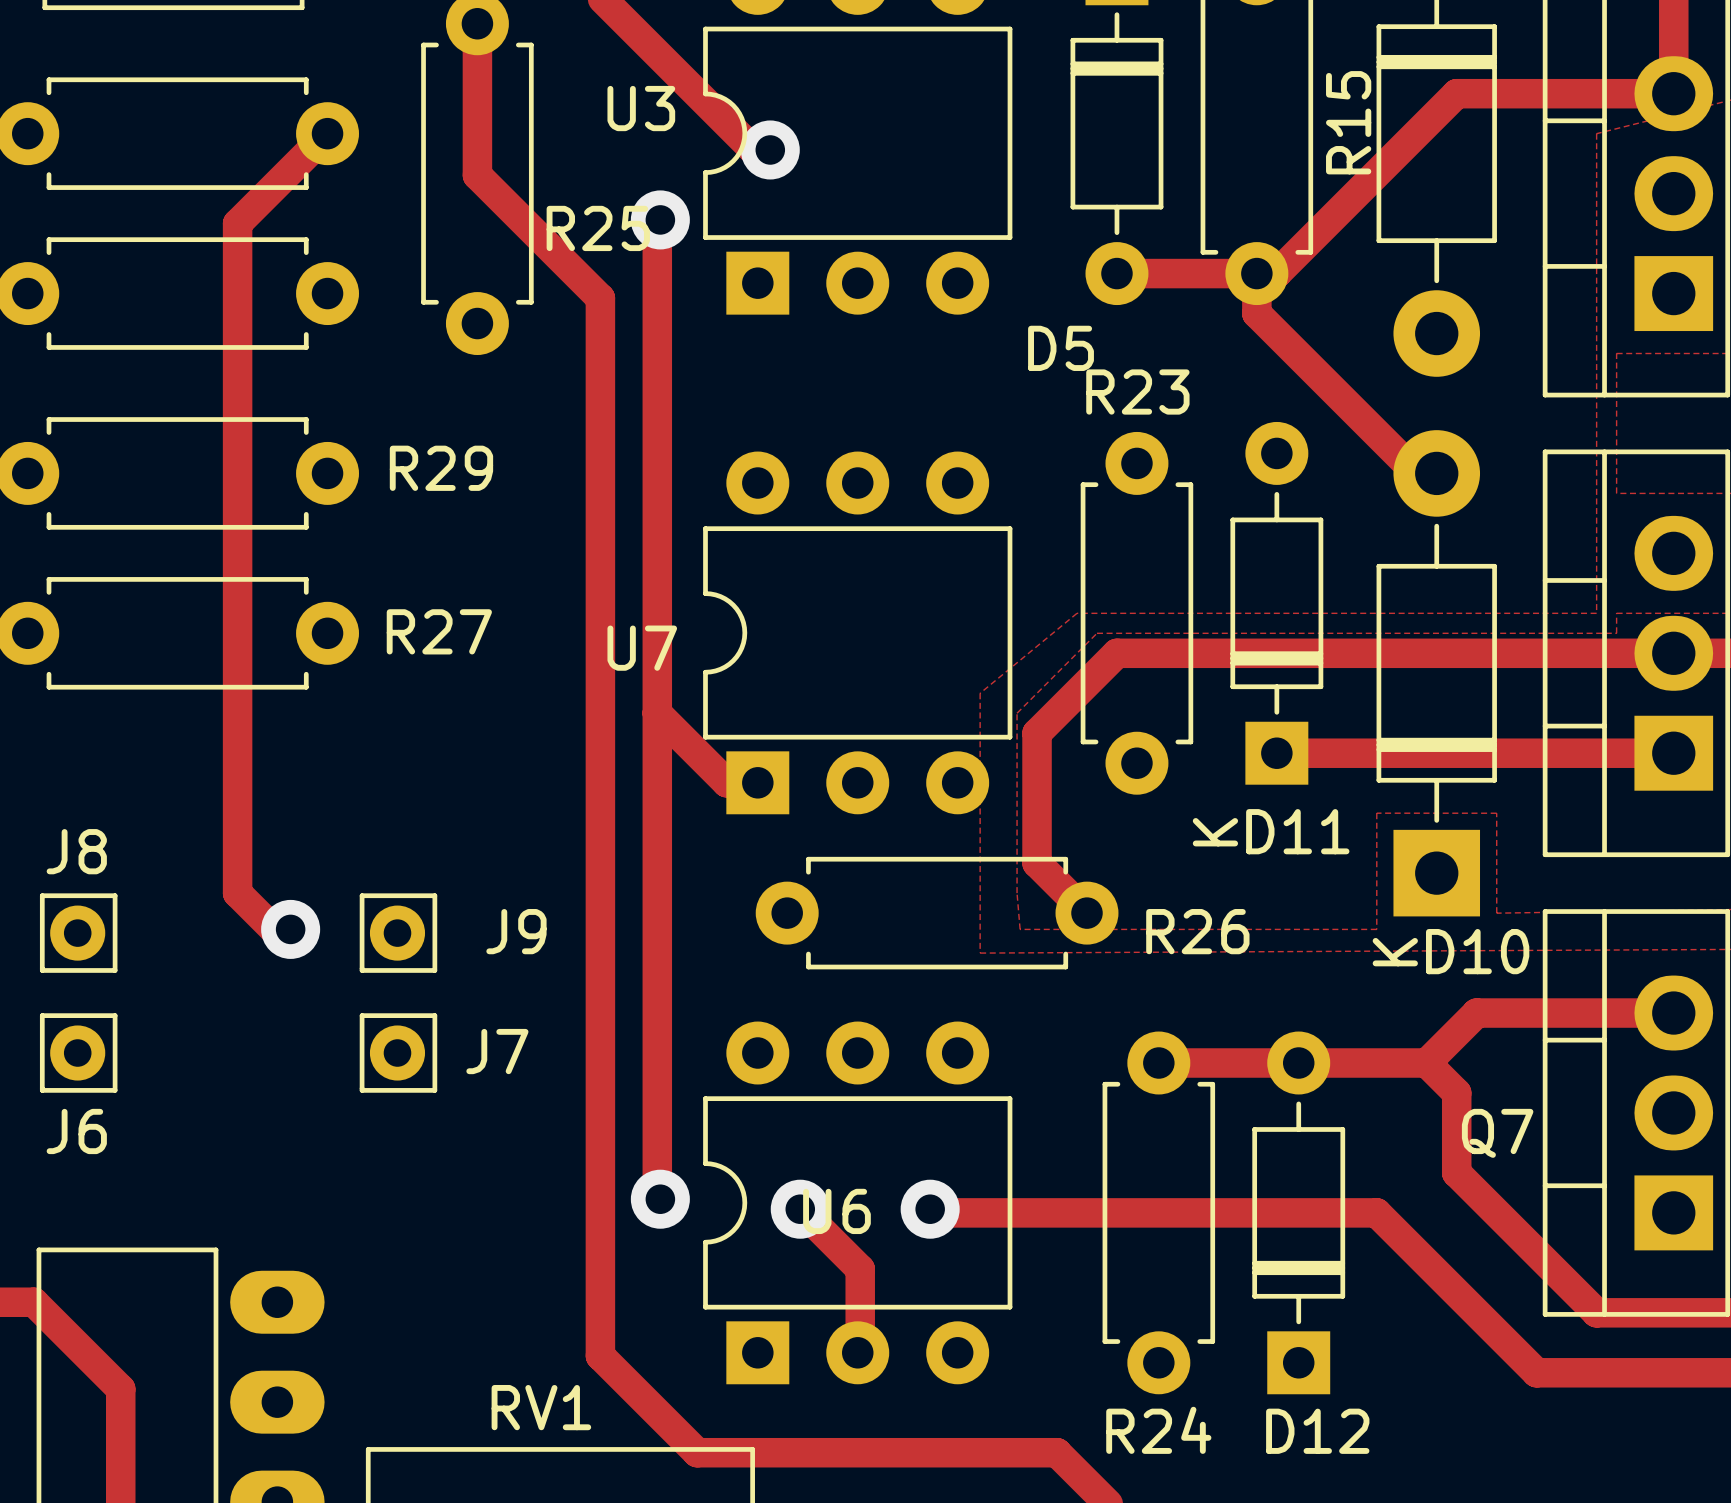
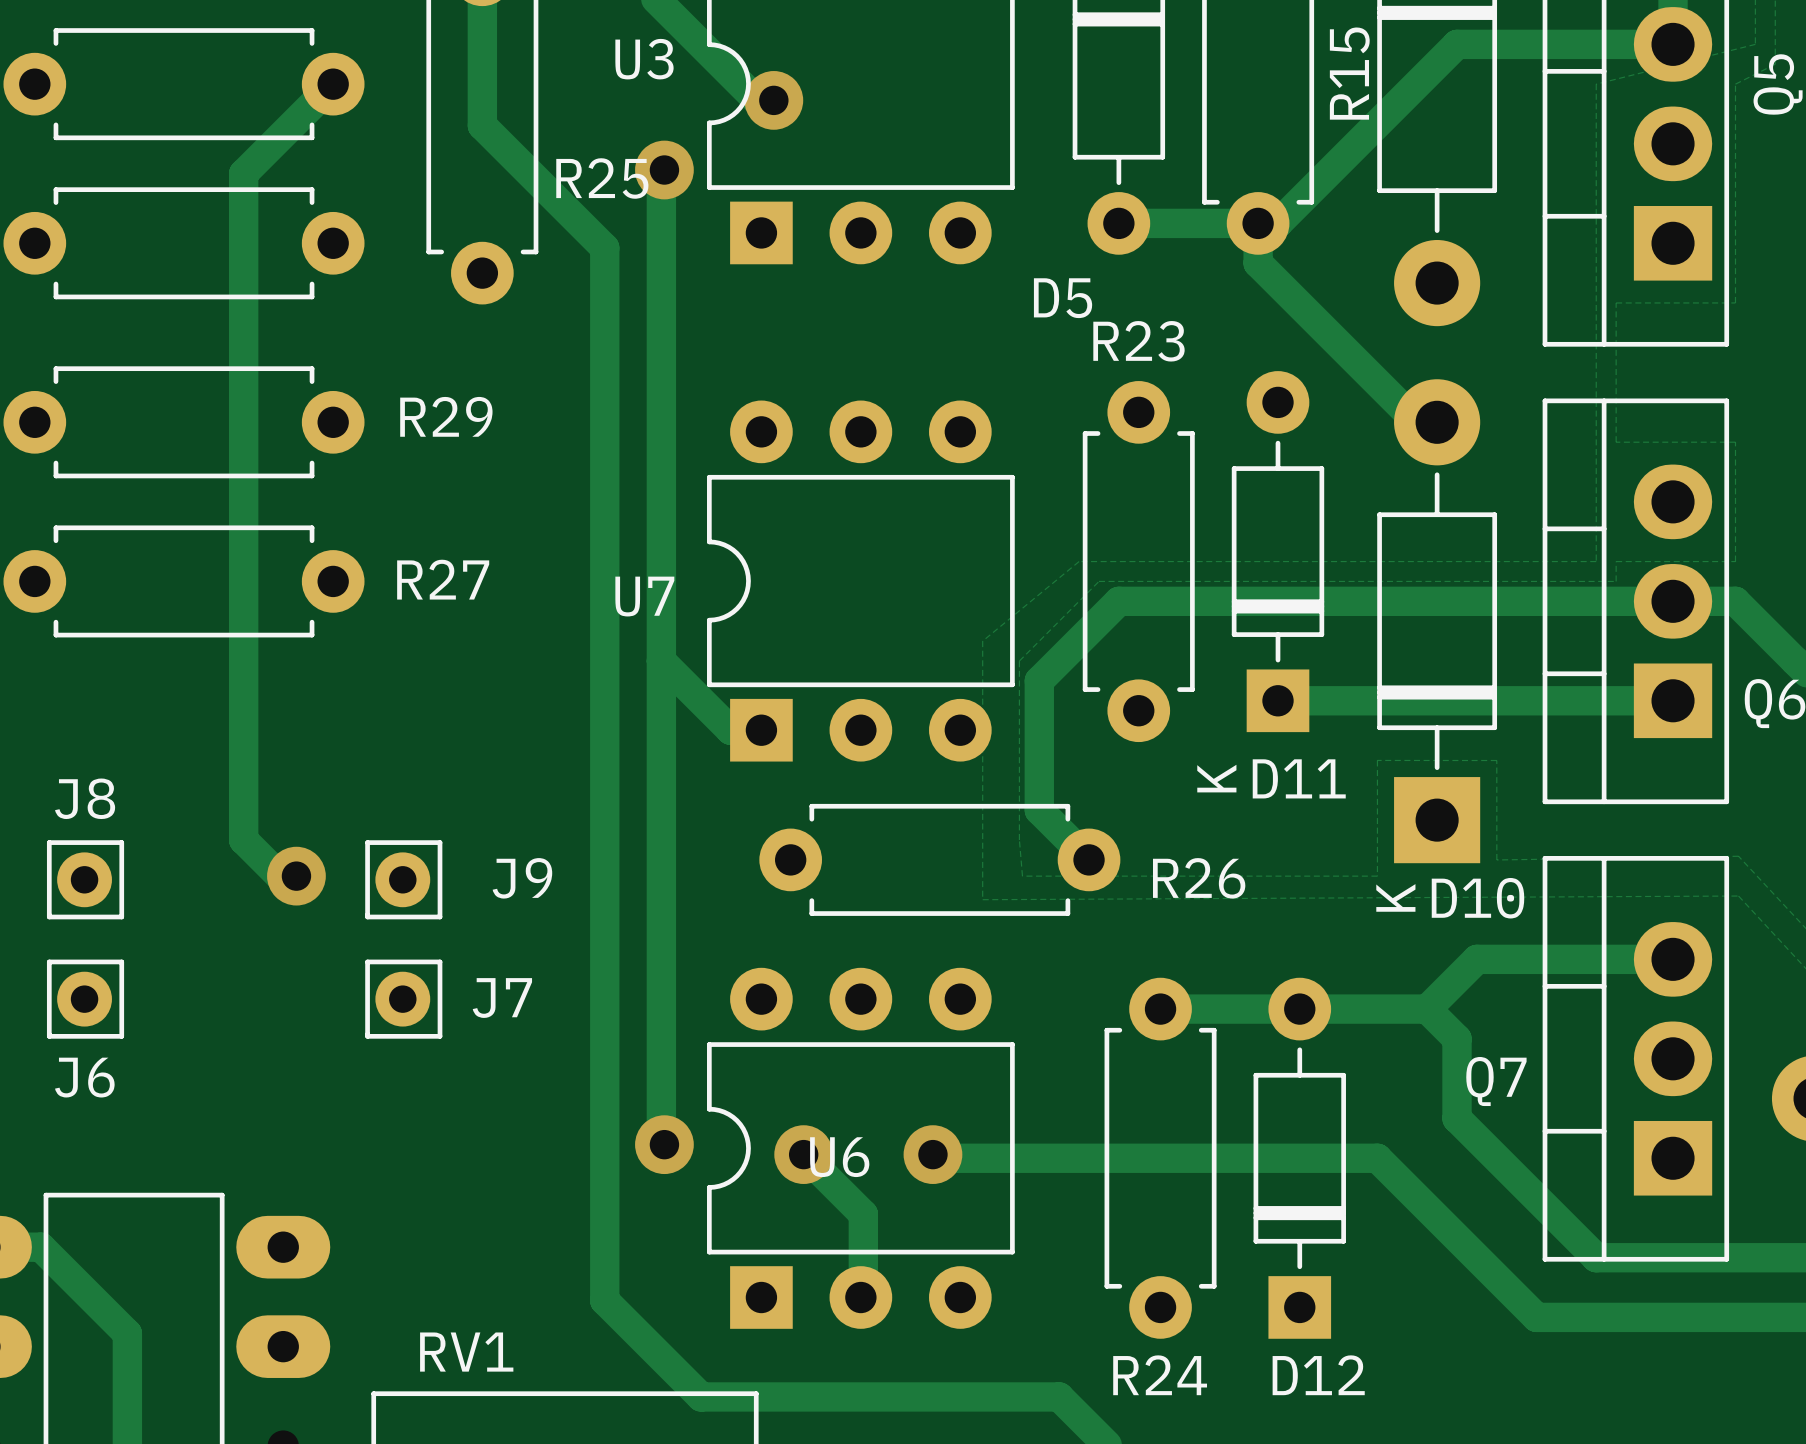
RV1 name position: RV1 (541, 1407) -> RV1 (466, 1352)

